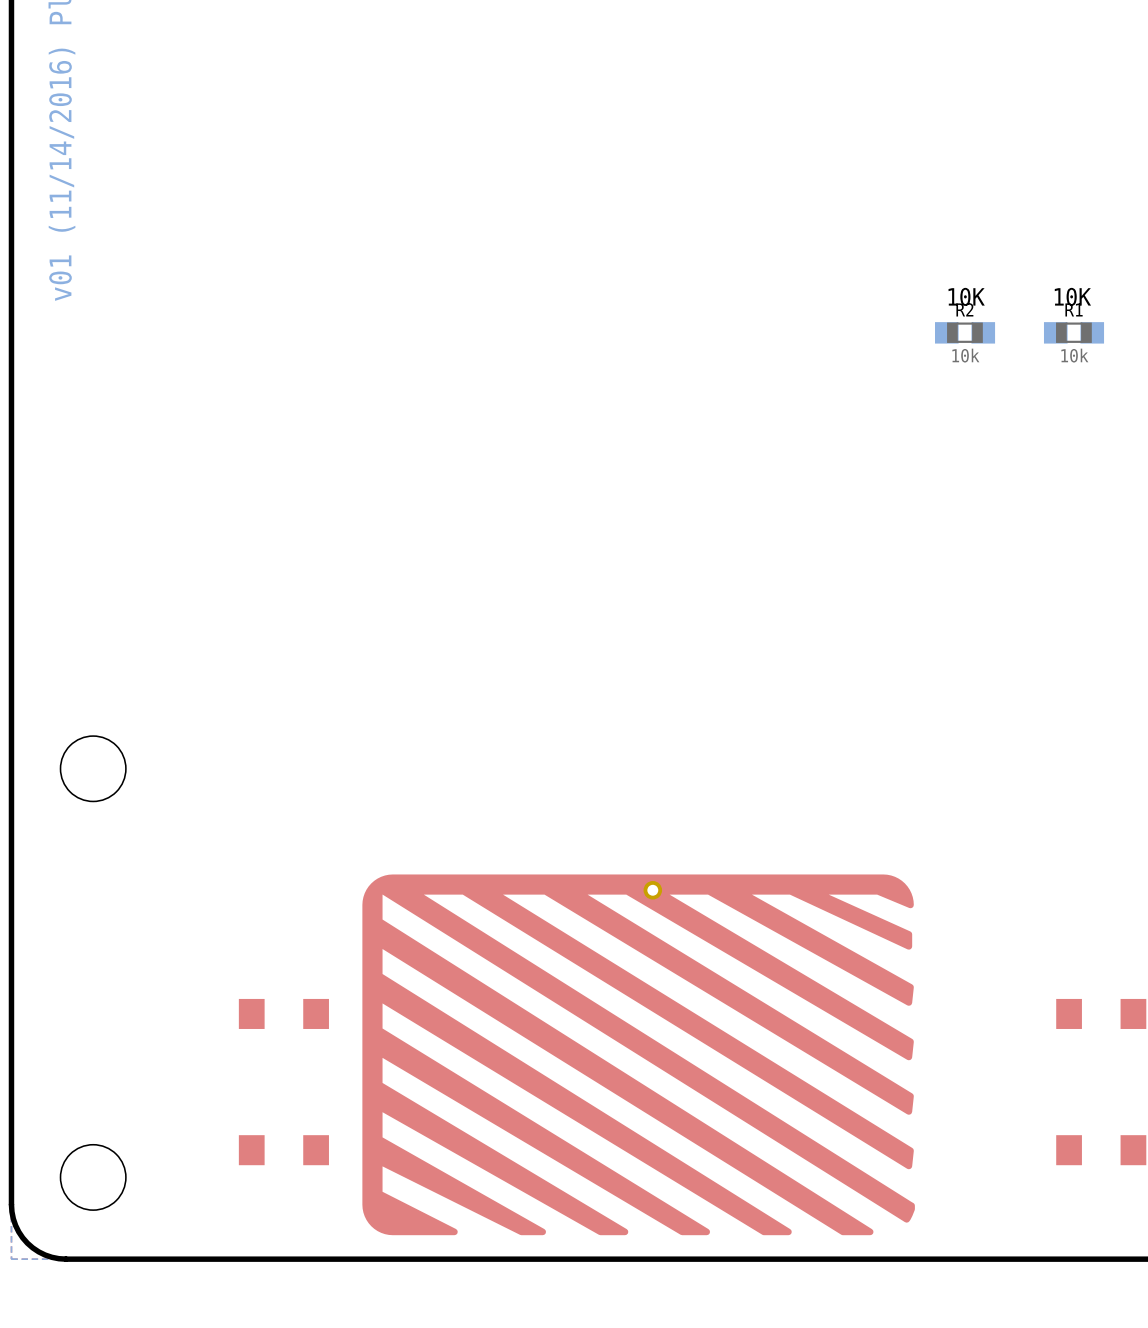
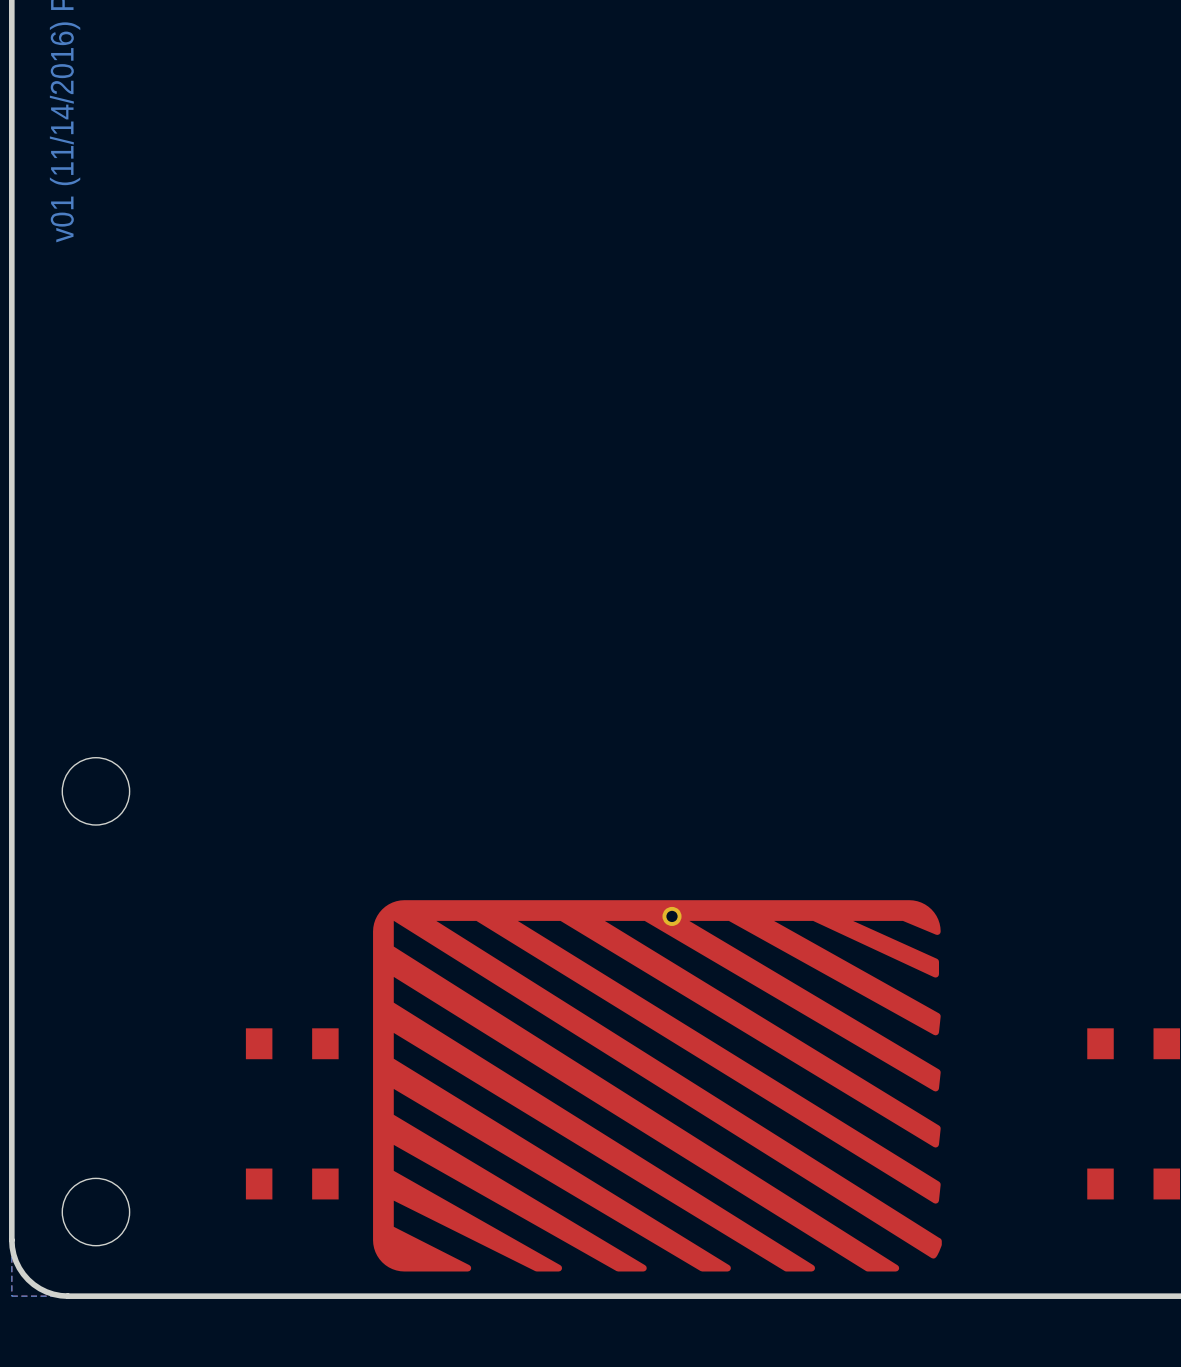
text: 10K (966, 296) -> none
text: 10K (1072, 296) -> none
R2: 10k (965, 332) -> none
R1: 10k (1074, 332) -> none

